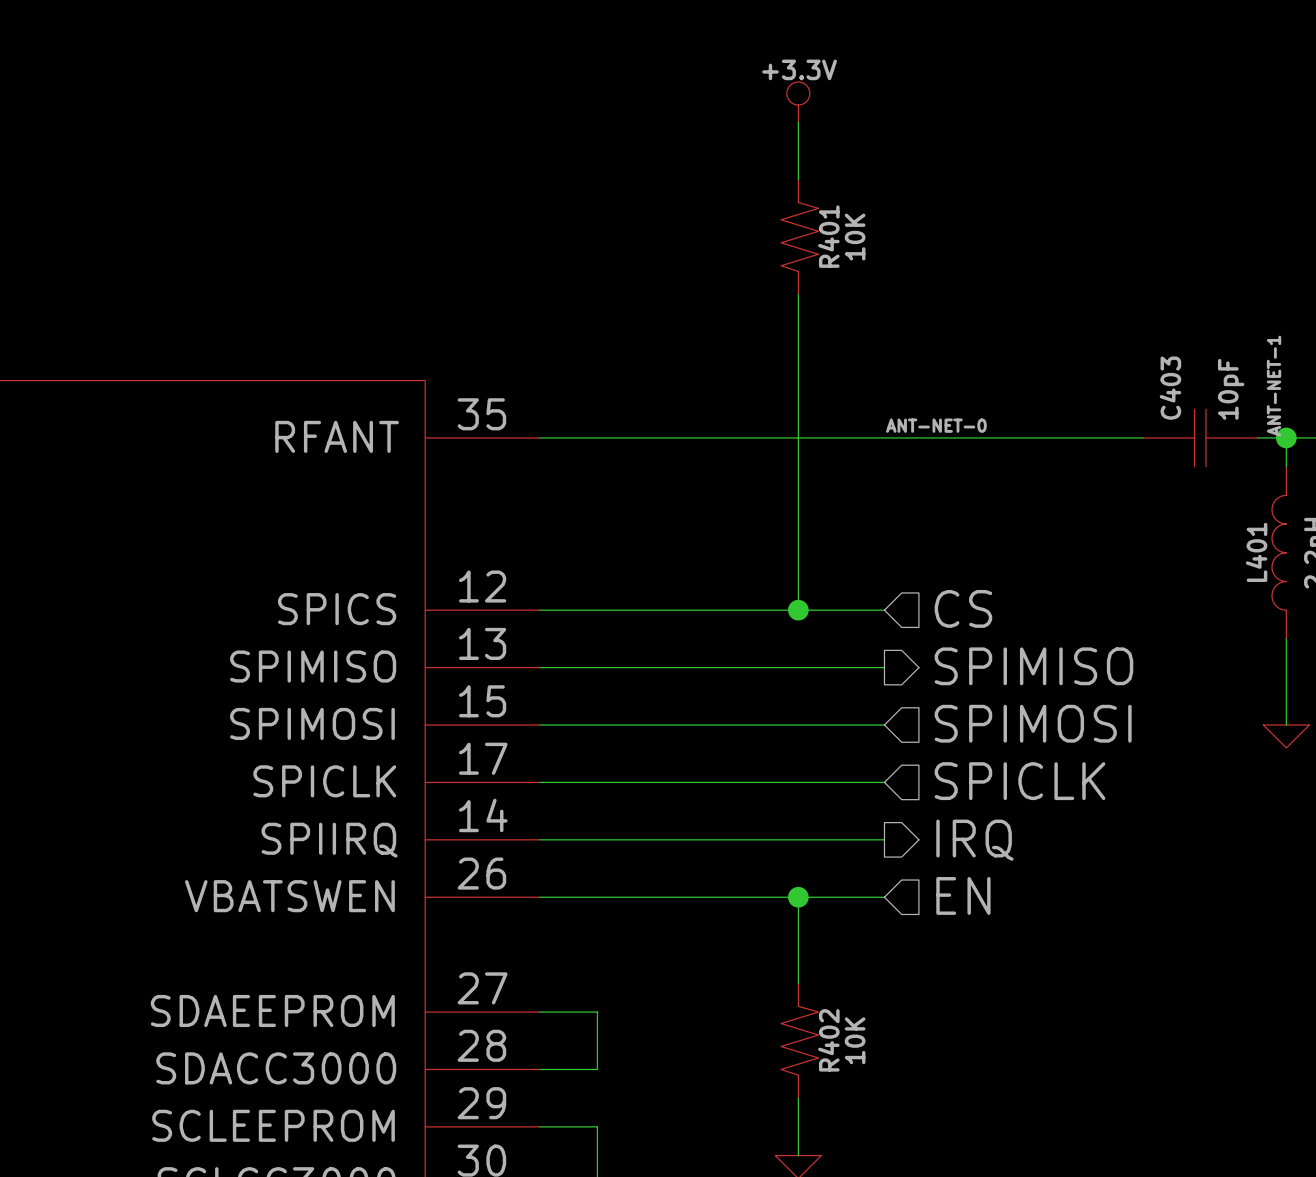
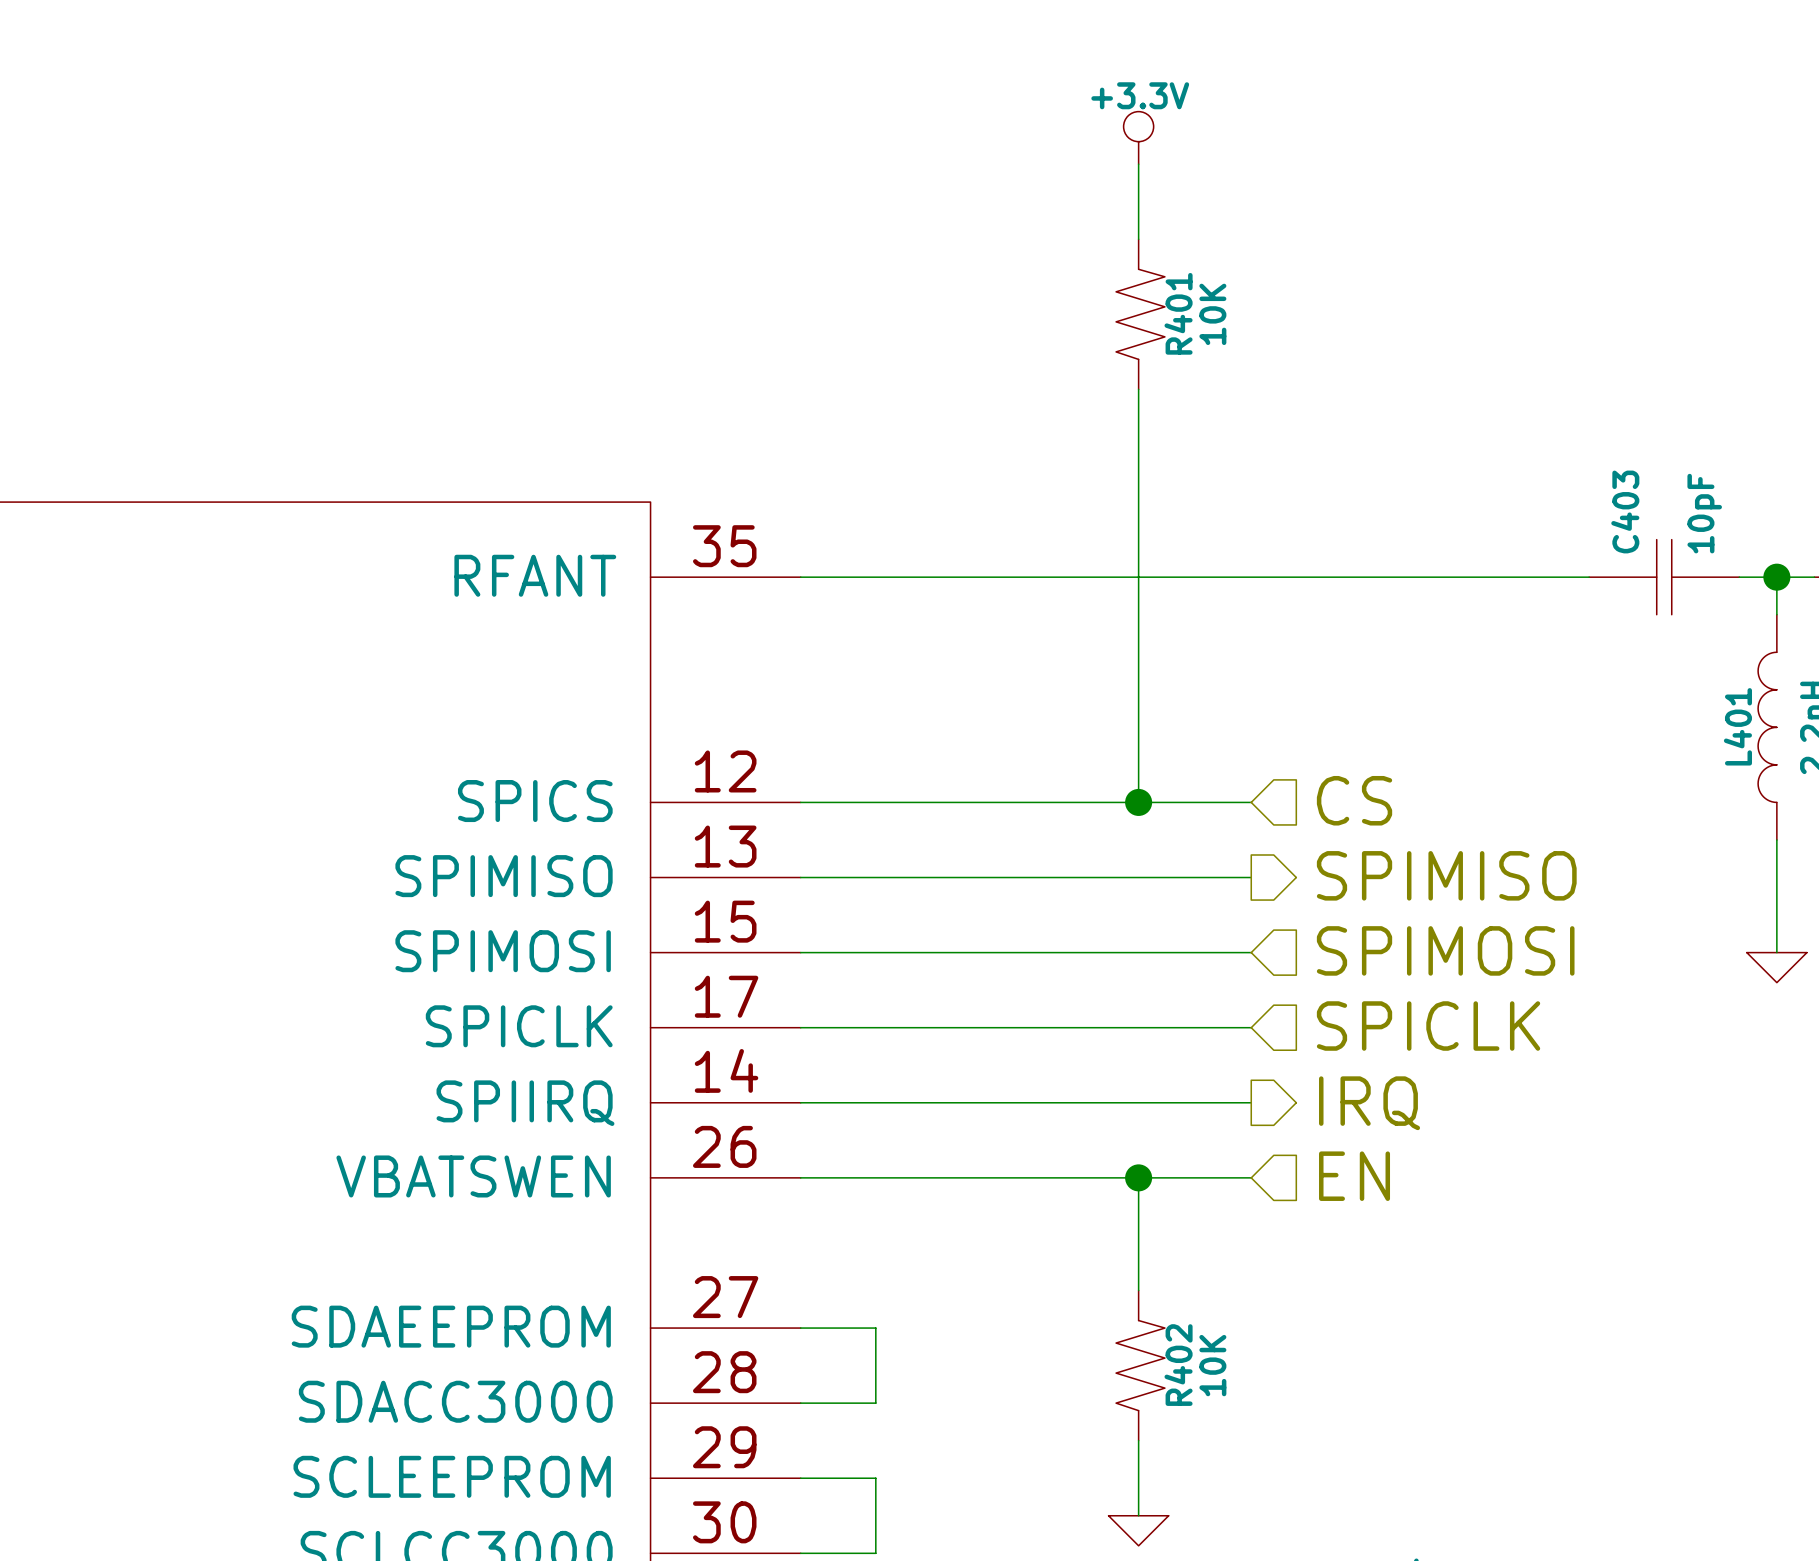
label: ANT-NET-1 (1274, 386) -> none
label: ANT-NET-0 (936, 425) -> none

